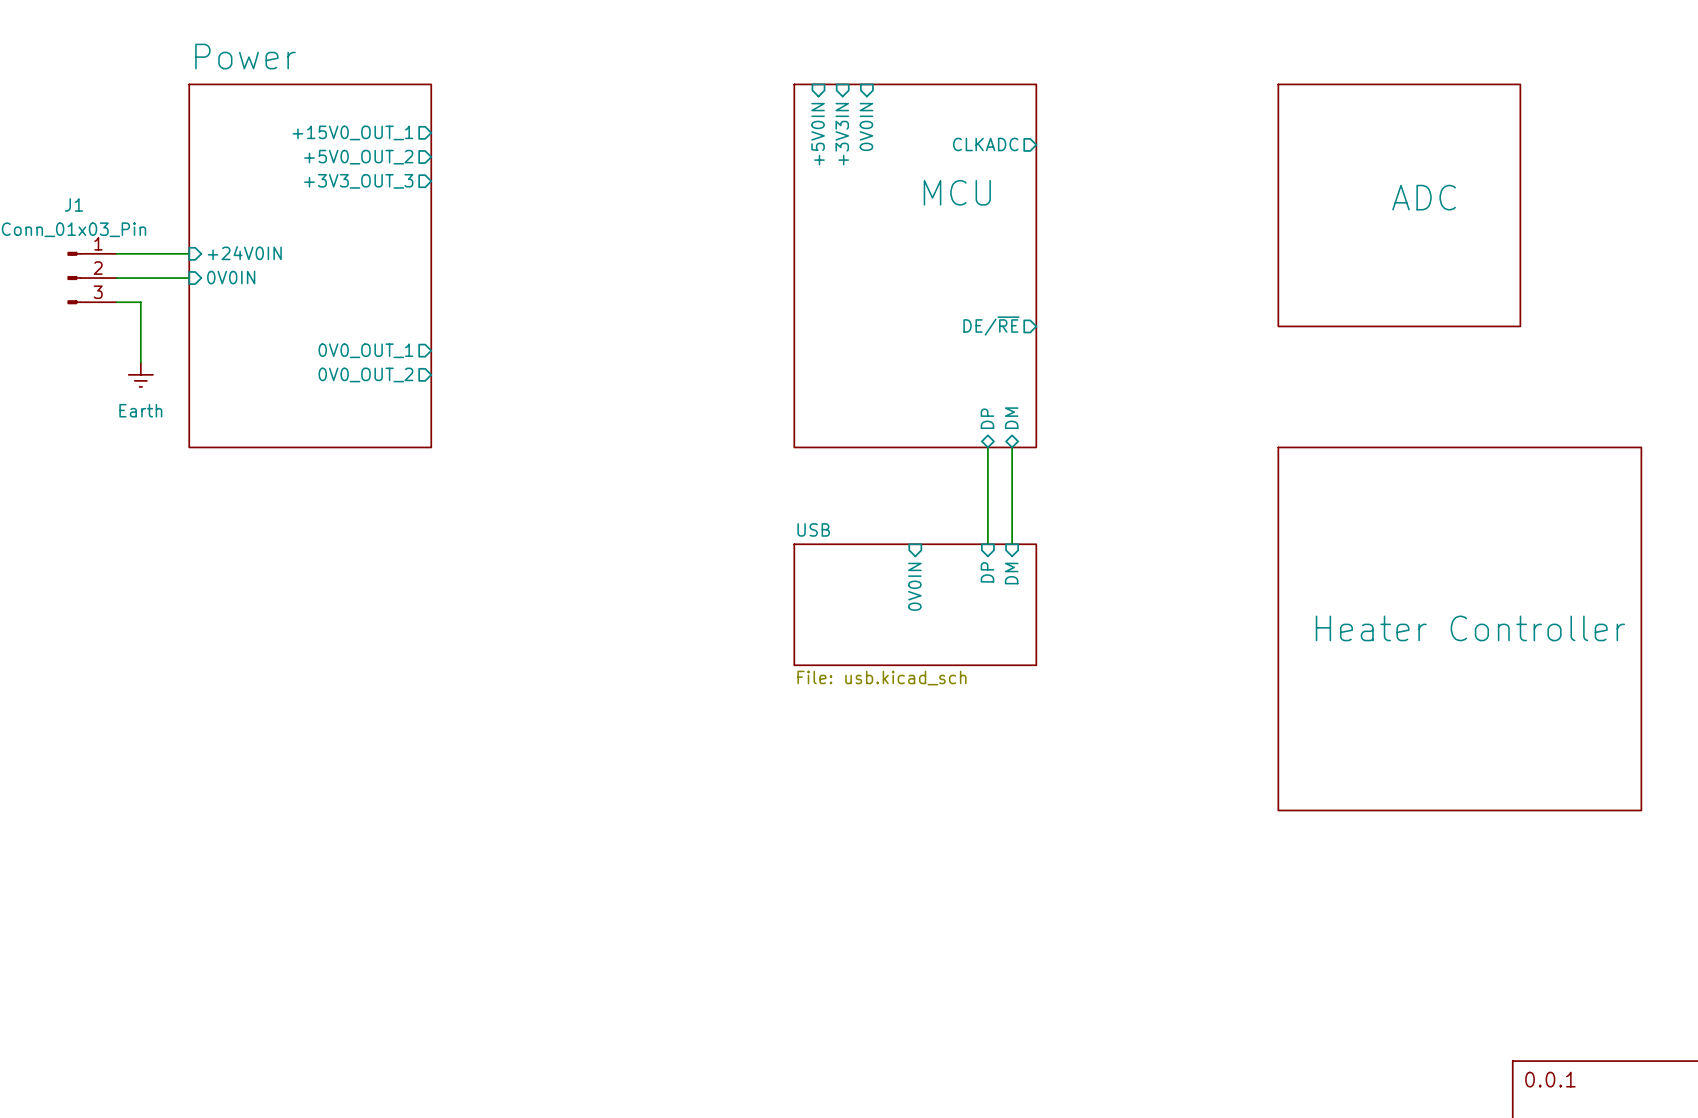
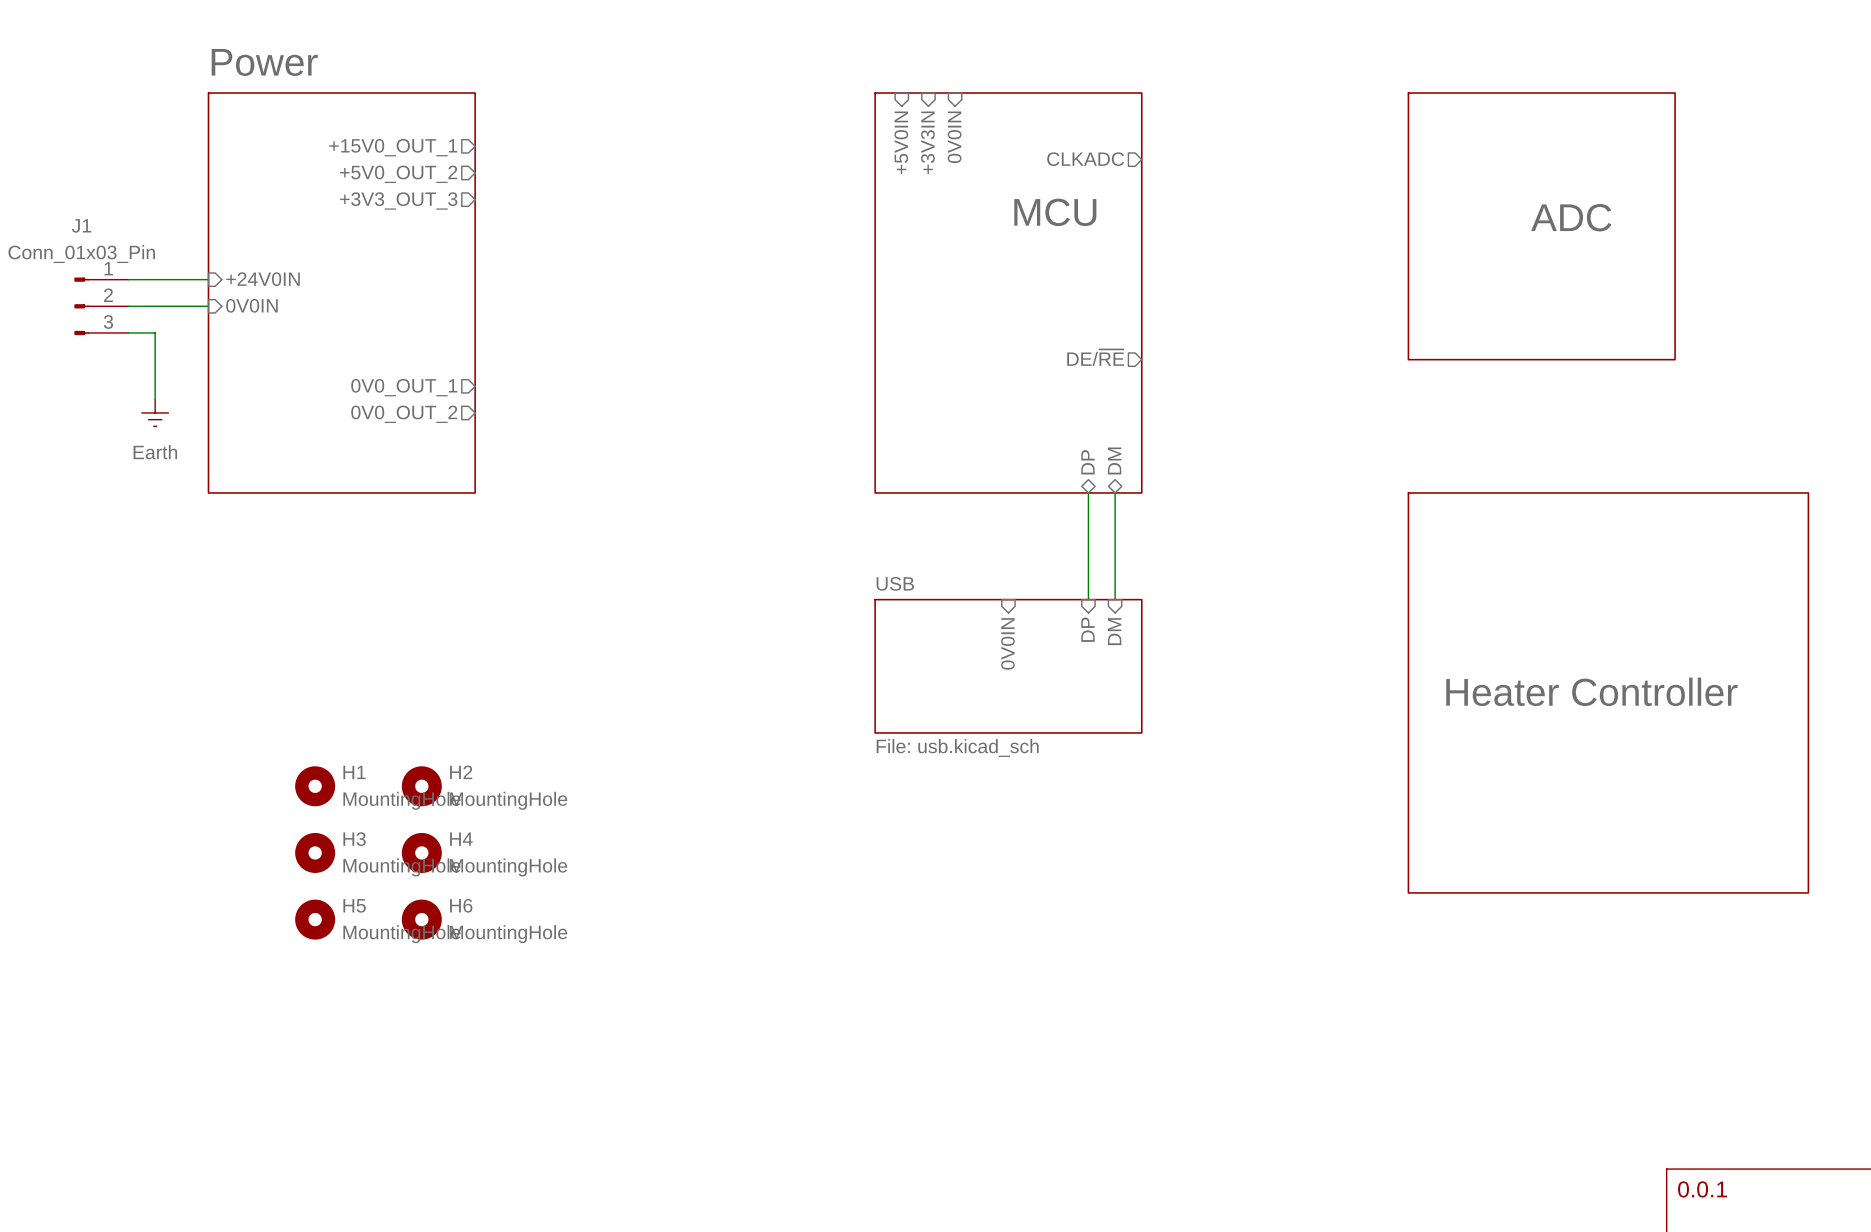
H1: none -> MountingHole (315, 786)
H2: none -> MountingHole (421, 786)
H3: none -> MountingHole (315, 852)
H4: none -> MountingHole (421, 852)
H5: none -> MountingHole (315, 919)
H6: none -> MountingHole (421, 919)

